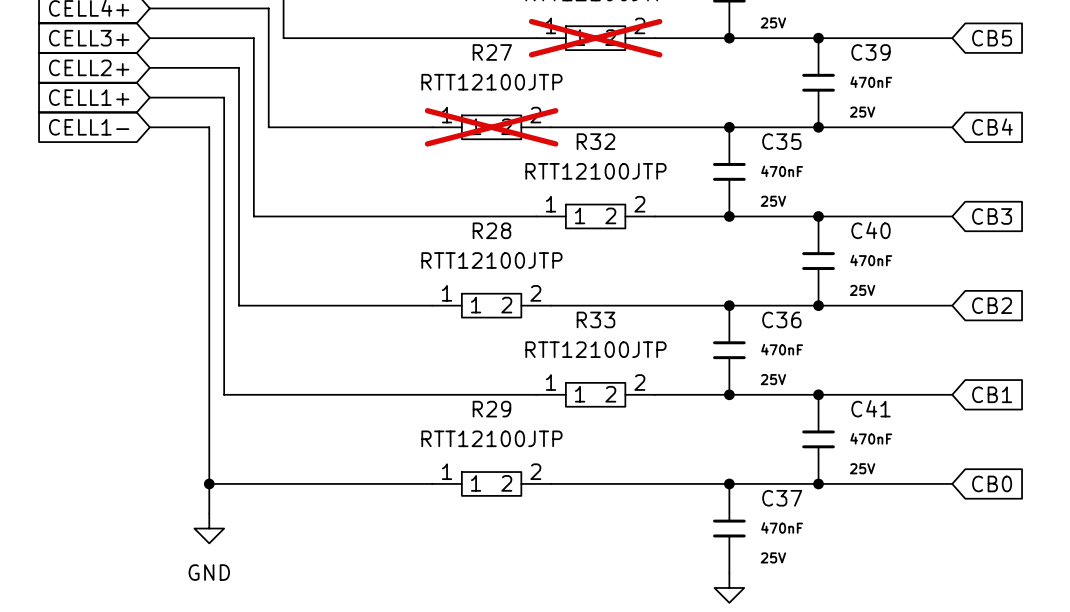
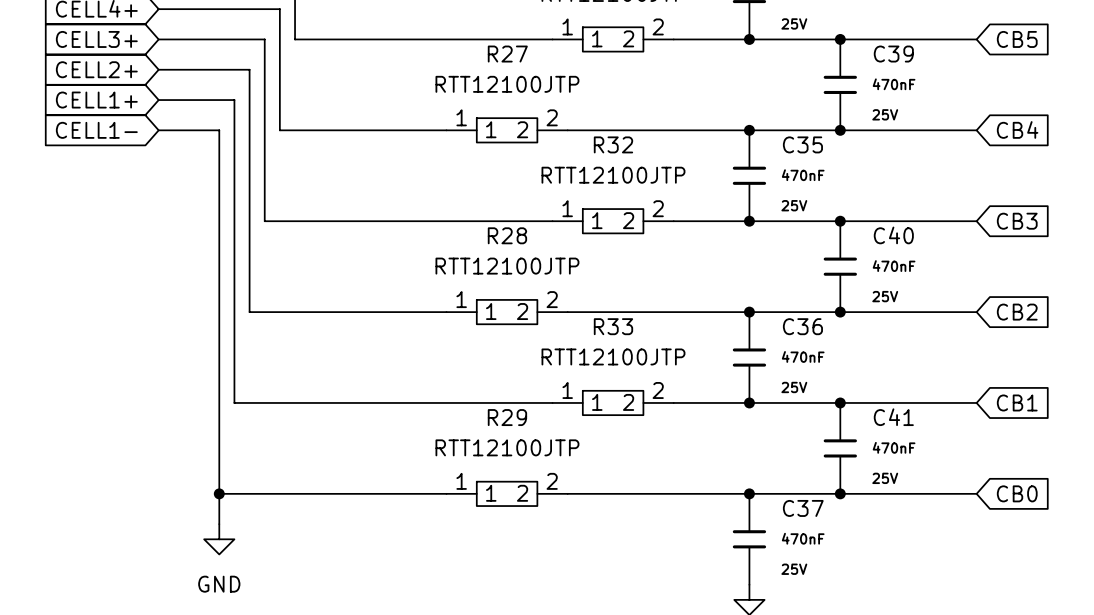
part do-not-place cross: (595, 38) -> none
R27 do-not-place cross: (491, 127) -> none

